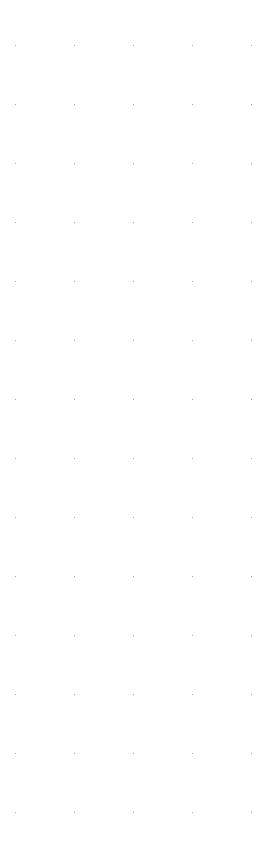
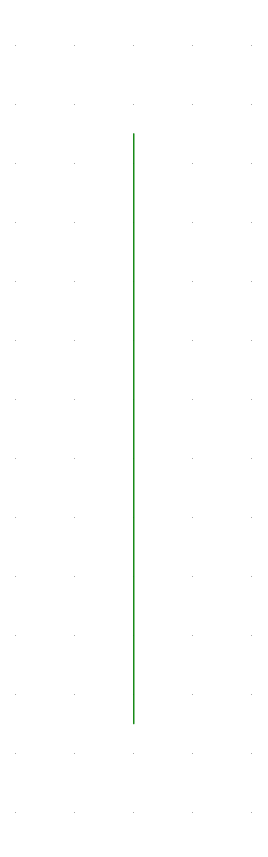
wire: none -> (133, 133) (133, 723)

